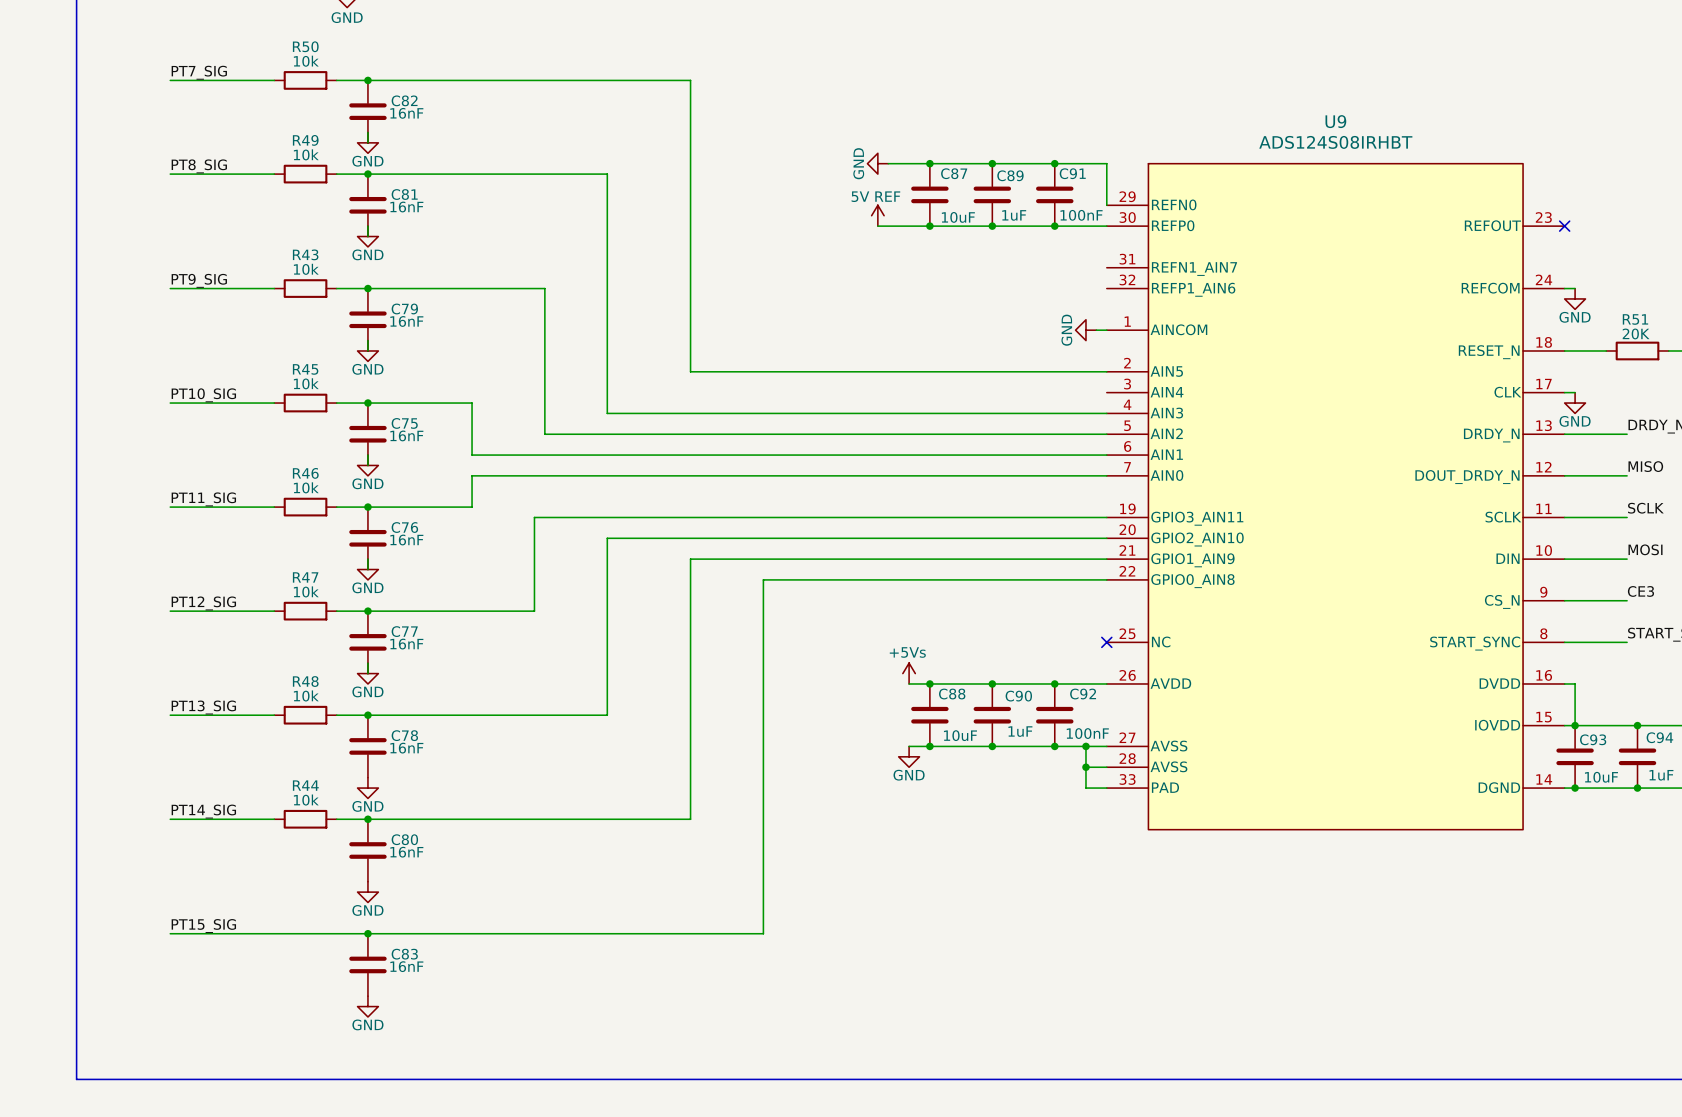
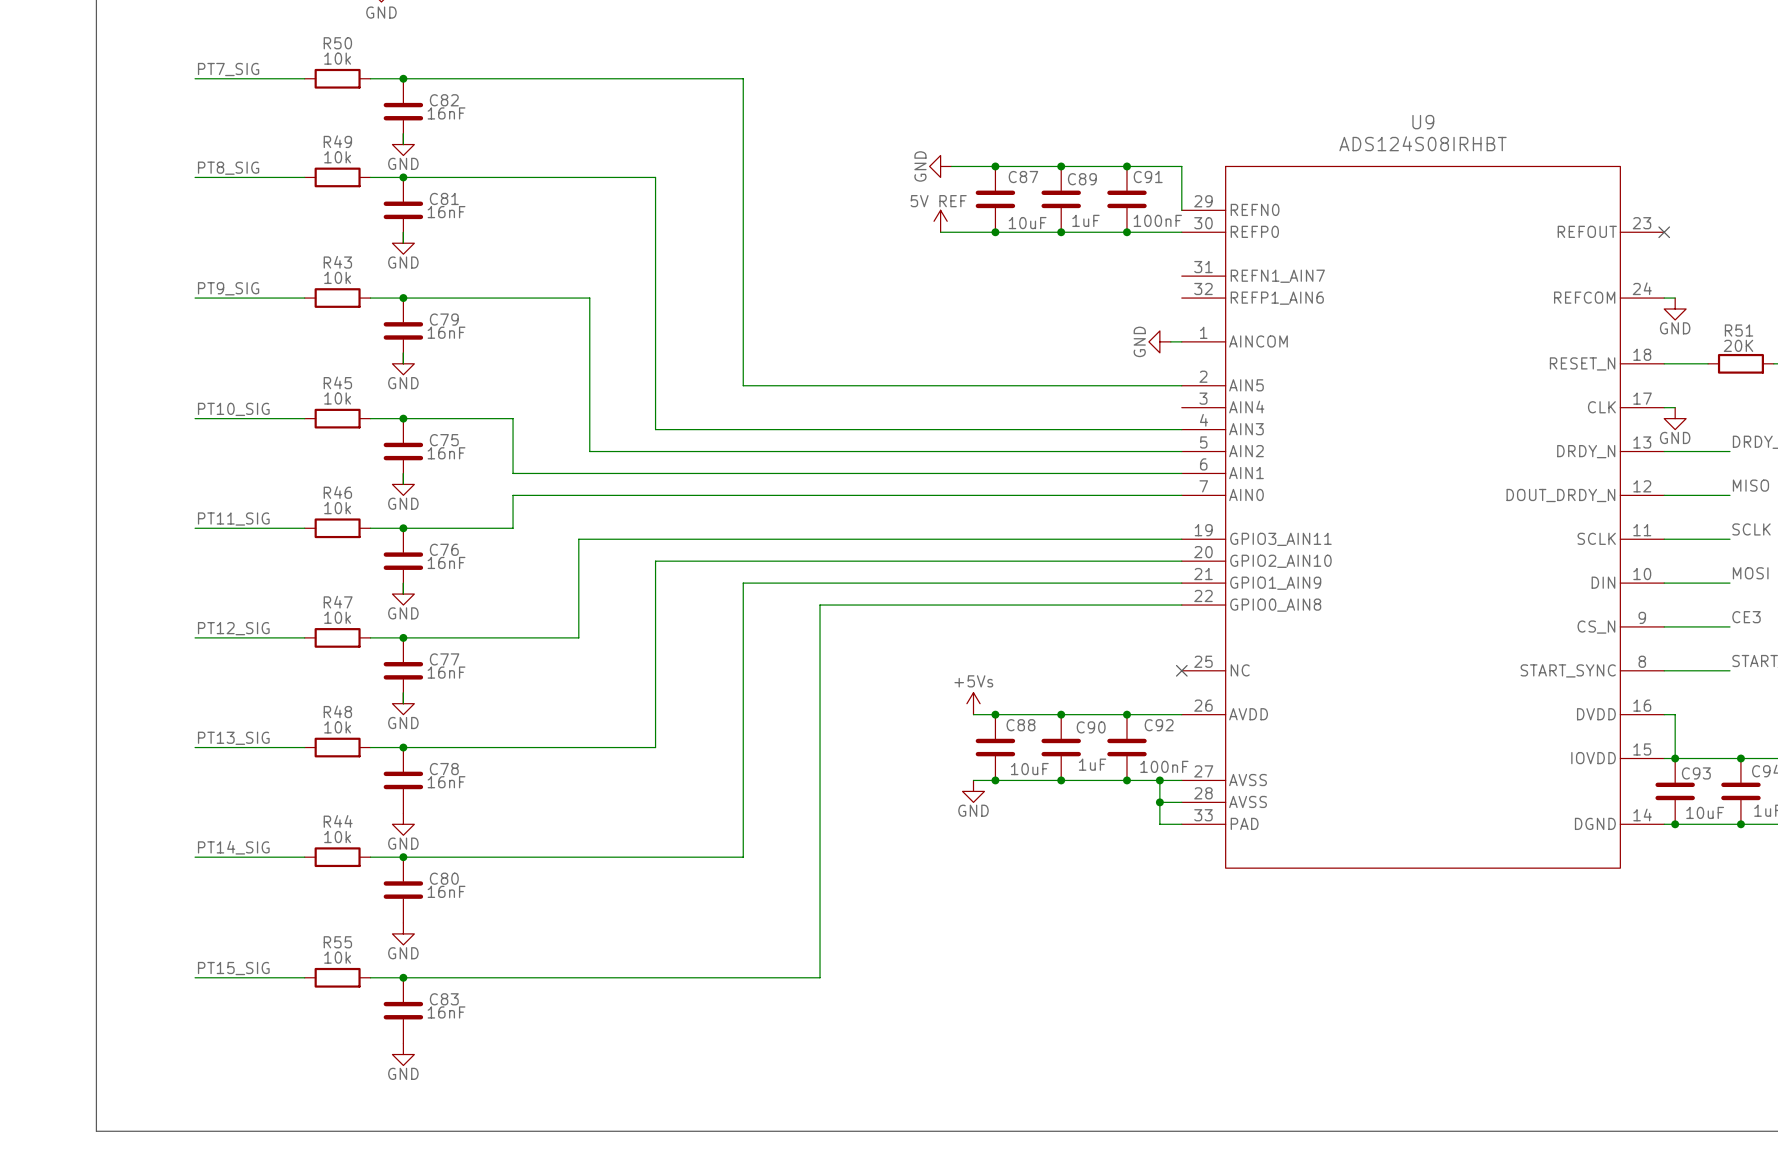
wire: (274, 933) (336, 933) -> none
R55: none -> 10k (337, 977)

